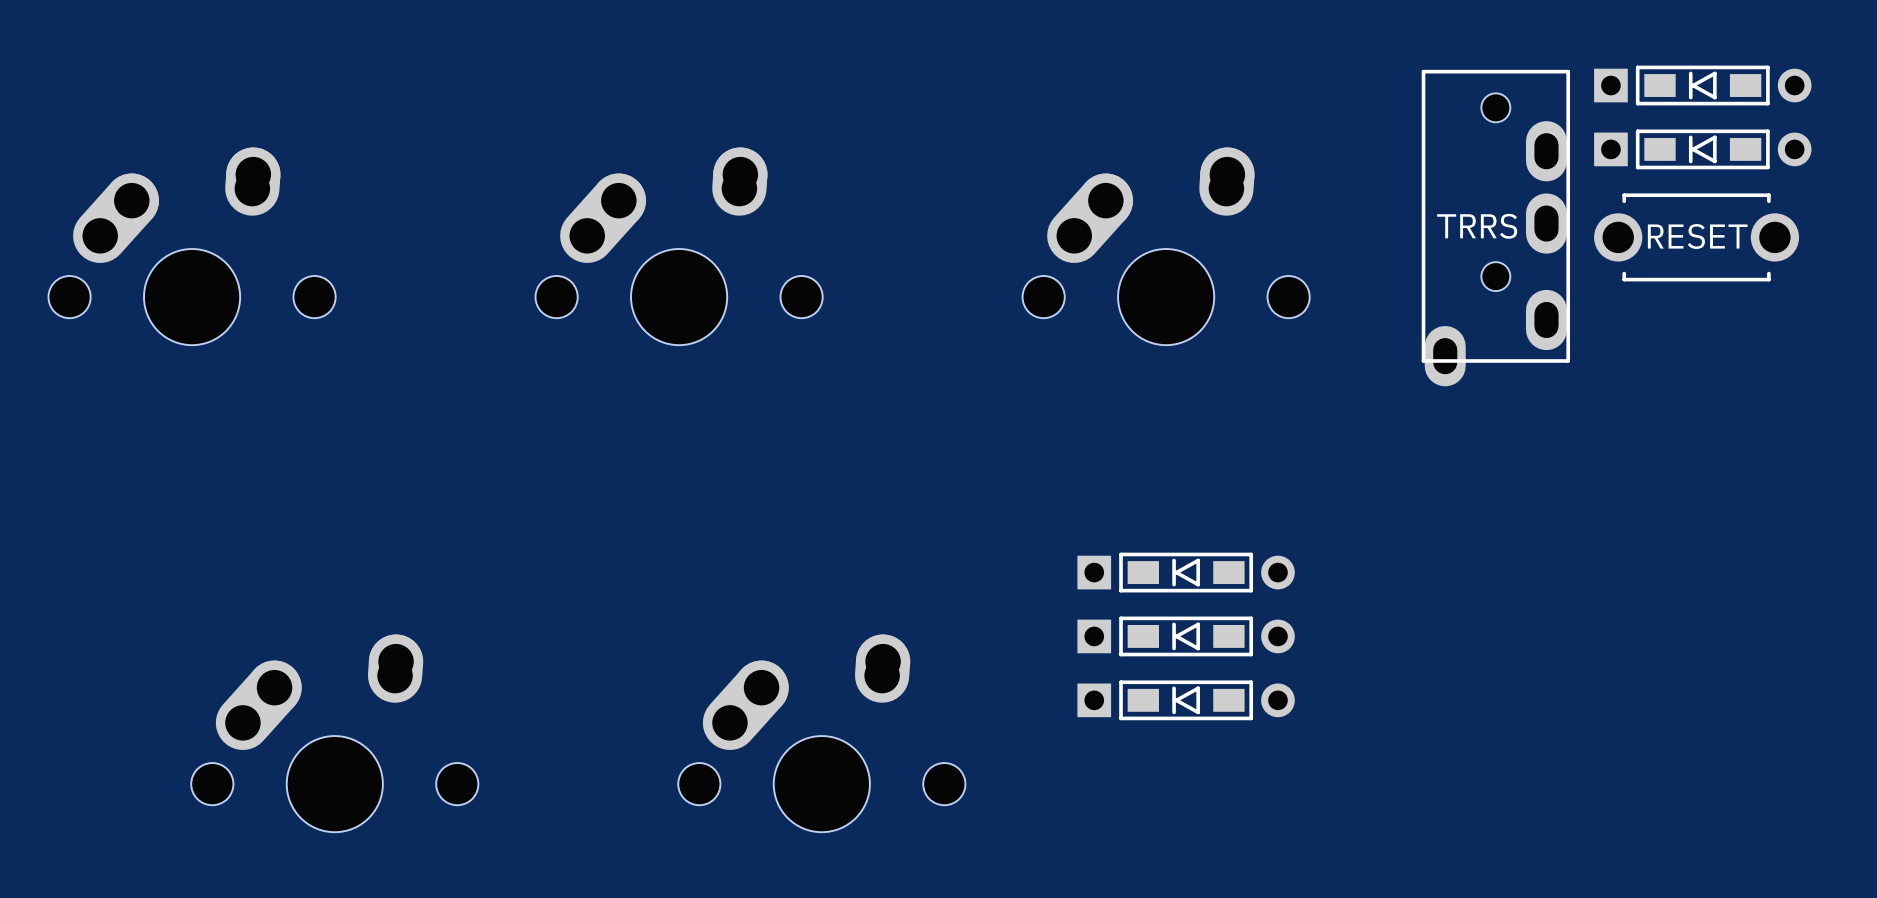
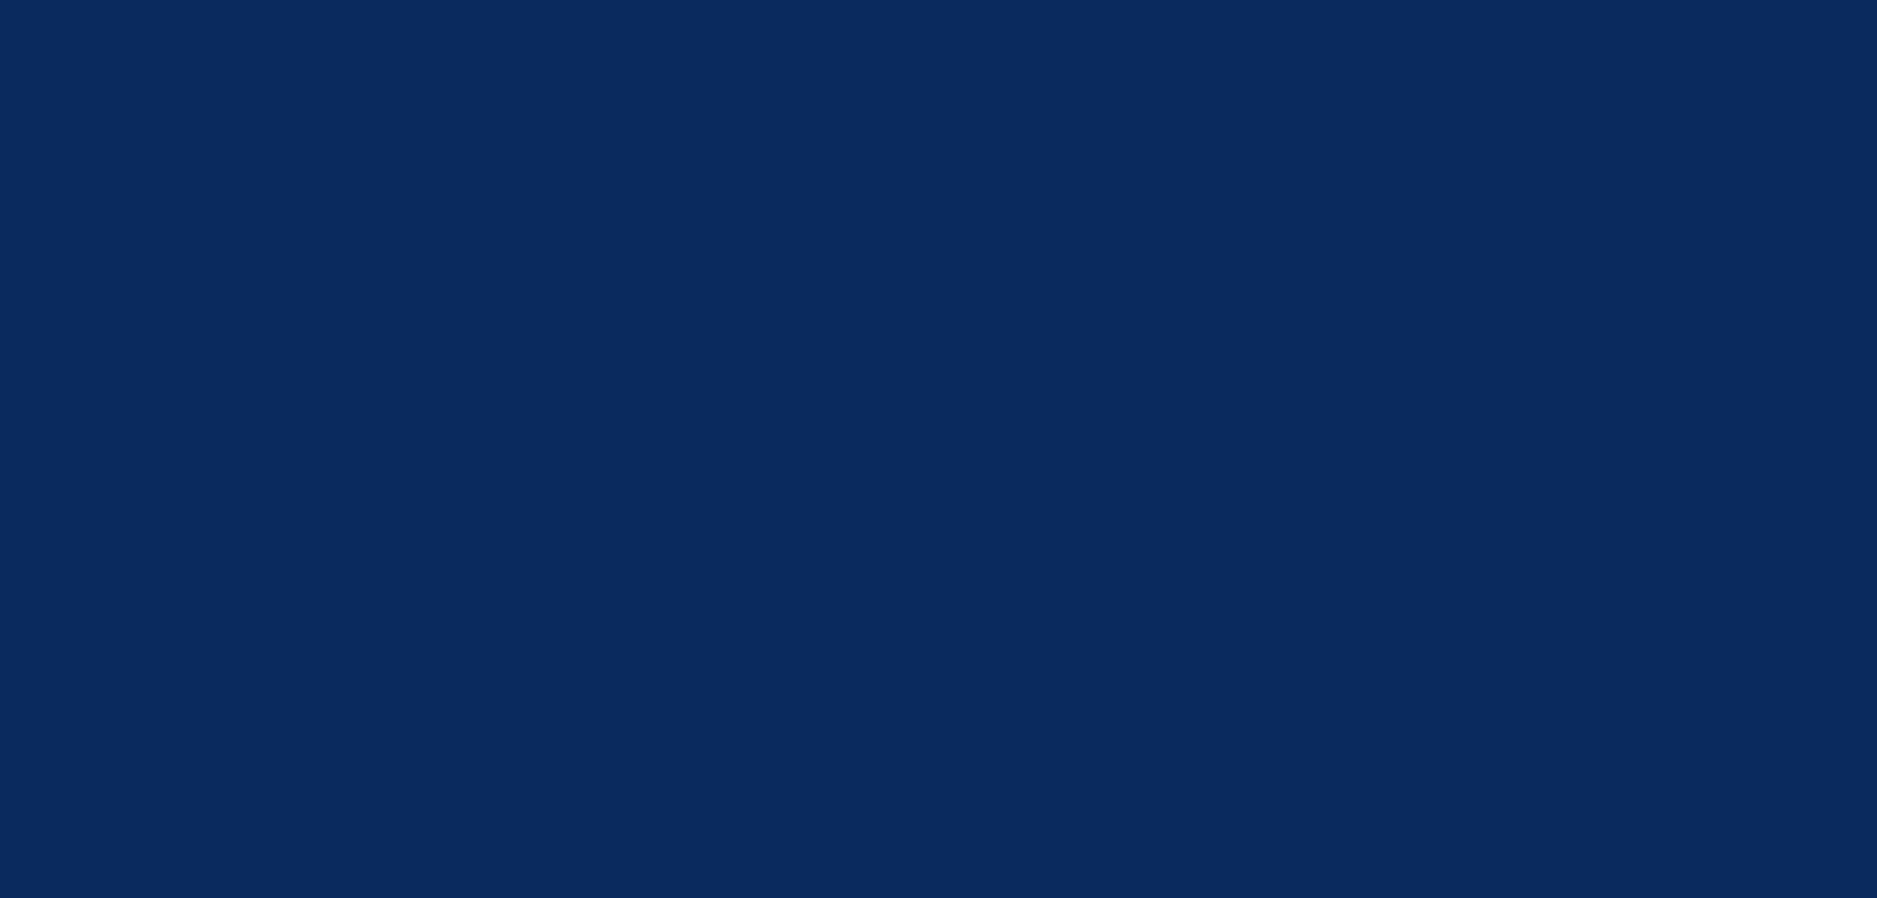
part: (1702, 85) -> none
part: (1702, 149) -> none
part: (1495, 228) -> none
part: (1696, 237) -> none
part: (192, 246) -> none
part: (679, 246) -> none
part: (1166, 246) -> none
part: (1186, 572) -> none
part: (1186, 636) -> none
part: (1186, 700) -> none
part: (334, 733) -> none
part: (821, 733) -> none

